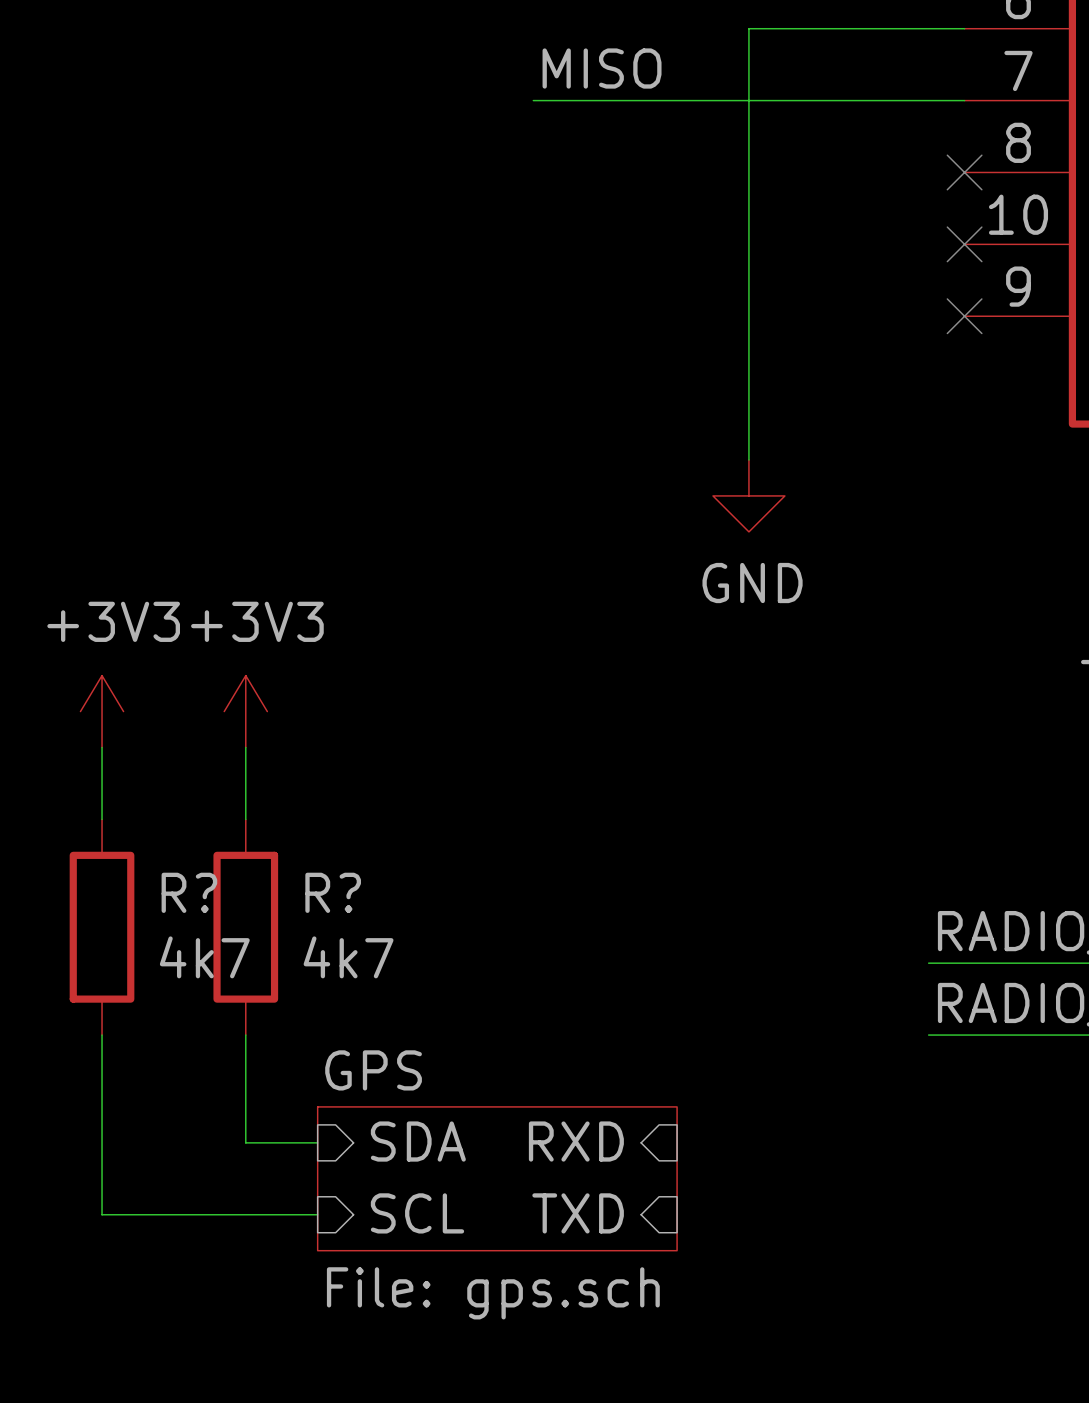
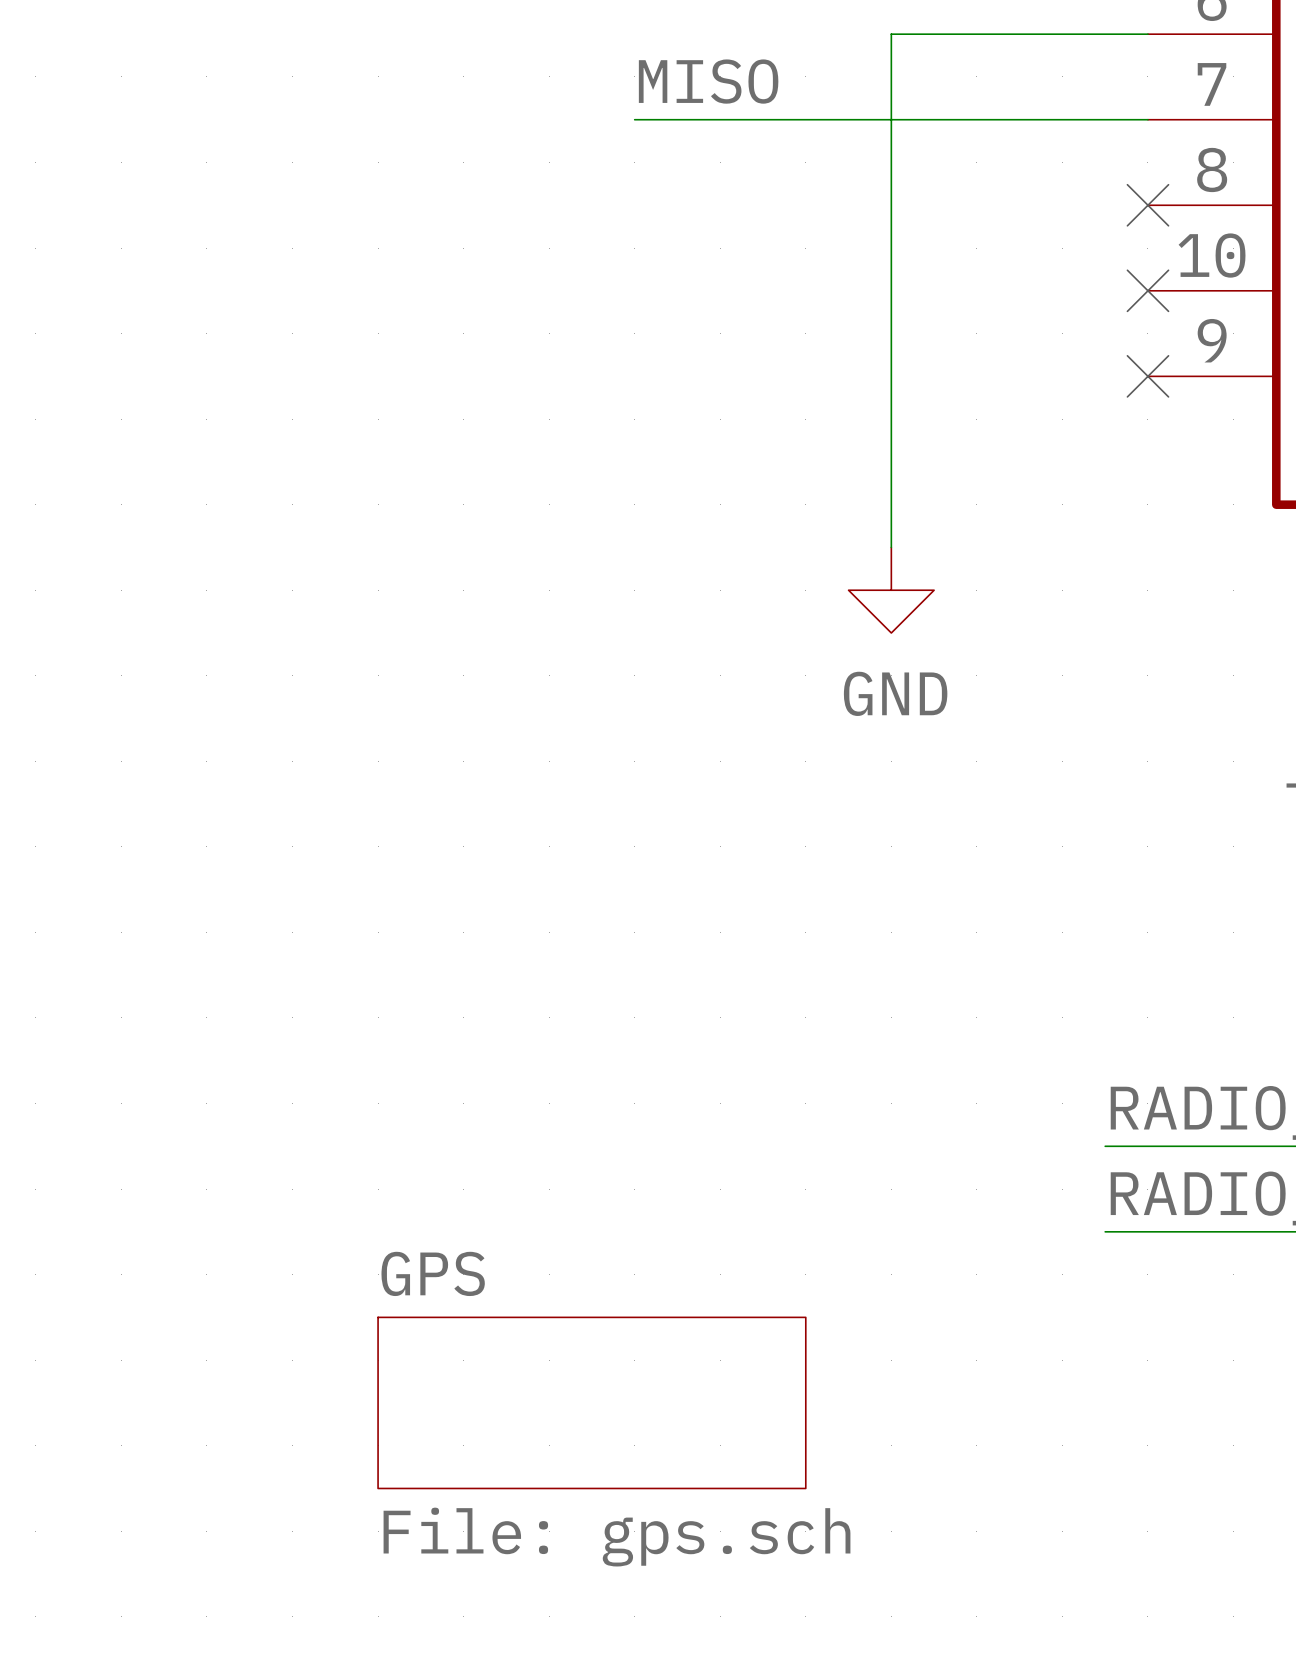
power symbol: +3V3 (102, 711) -> none
power symbol: +3V3 (245, 711) -> none
wire: (102, 747) (102, 819) -> none
wire: (245, 747) (245, 819) -> none
R?: 4k7 (102, 927) -> none
R?: 4k7 (245, 927) -> none
wire: (102, 1035) (102, 1214) (317, 1214) -> none
wire: (245, 1035) (245, 1142) (317, 1142) -> none
sheet pin: SDA (418, 1141) -> none
sheet pin: RXD (576, 1141) -> none
sheet pin: SCL (417, 1213) -> none
sheet pin: TXD (578, 1213) -> none

